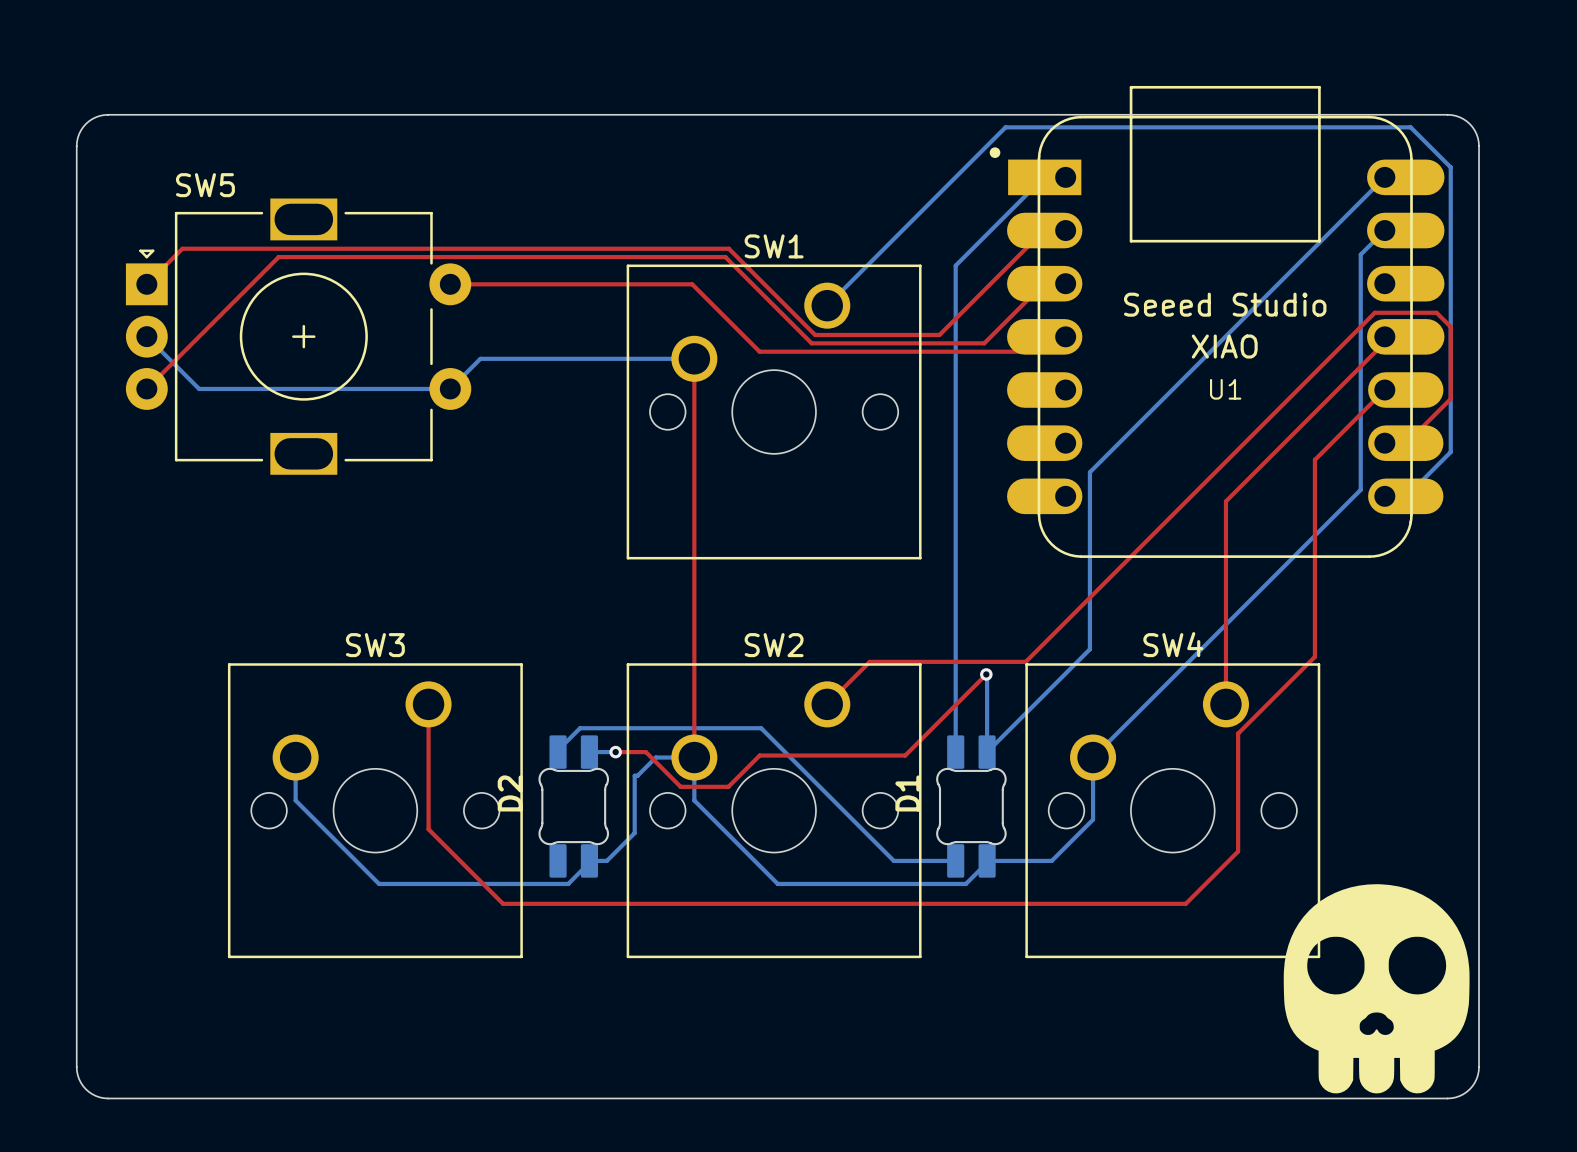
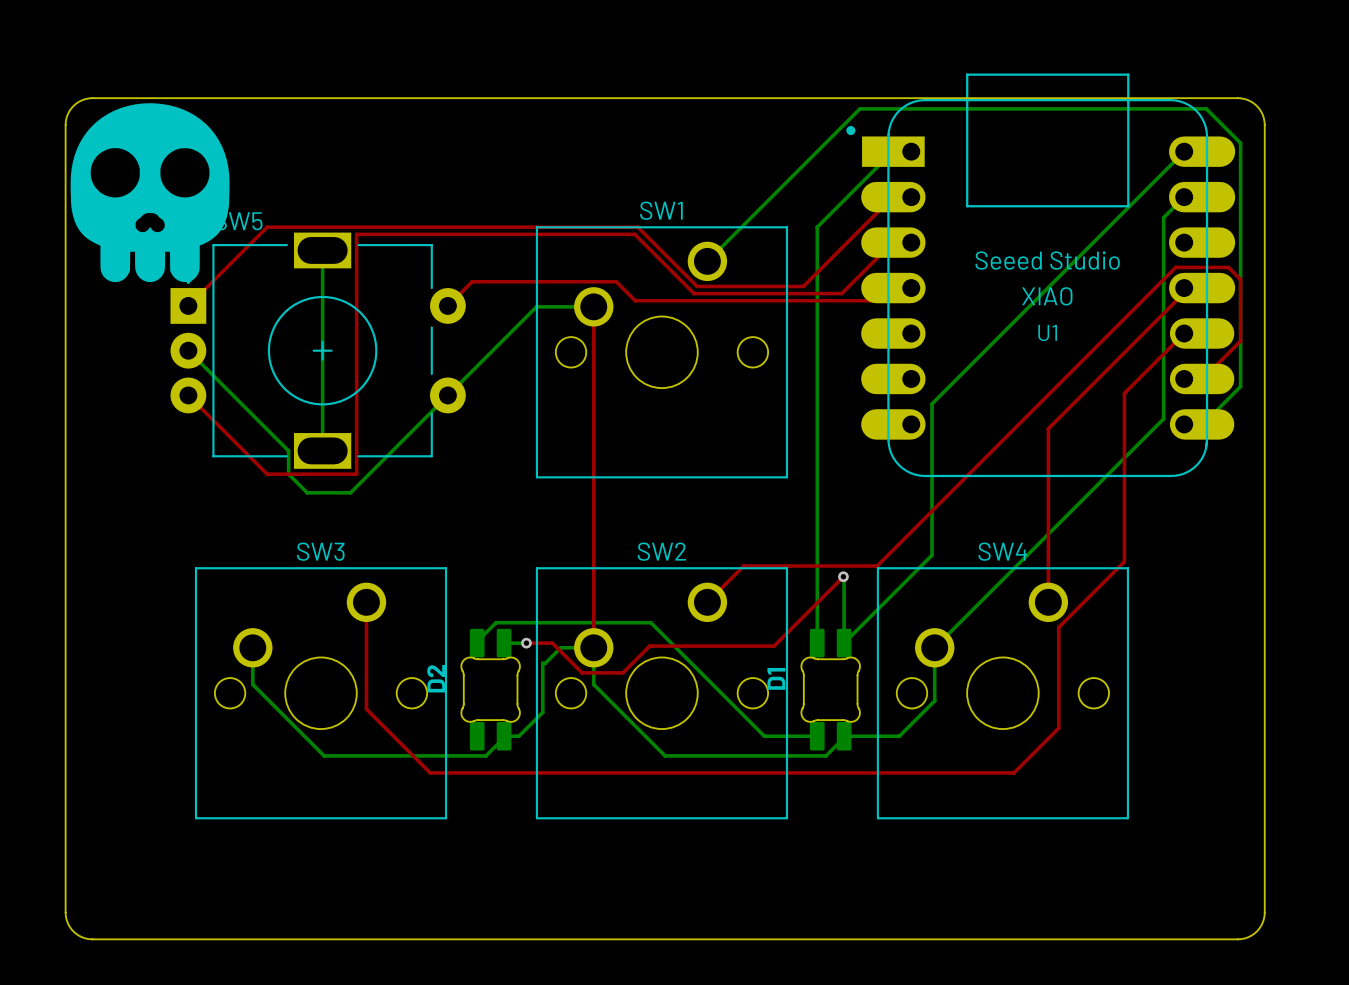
drawing: none -> [70, 103, 230, 283]
top track: (745, 265) (728, 248) (182, 248) (146, 284) -> (637, 227) (267, 227) (188, 305)
top track: (742, 274) (725, 257) (278, 257) (146, 388) -> (634, 234) (356, 234) (356, 474) (267, 474) (188, 395)
top track: (450, 284) (692, 284) (759, 351) -> (447, 305) (472, 281) (616, 281) (635, 300) (649, 300)
bottom track: none -> (322, 250) (322, 450)
bottom track: (146, 336) (199, 388) (450, 388) (480, 358) (627, 358) -> (188, 350) (288, 450) (288, 474) (307, 492) (350, 492) (536, 306)
SW5 position: (298, 336) -> (318, 350)
drawing: [1283, 884, 1470, 1094] -> none

